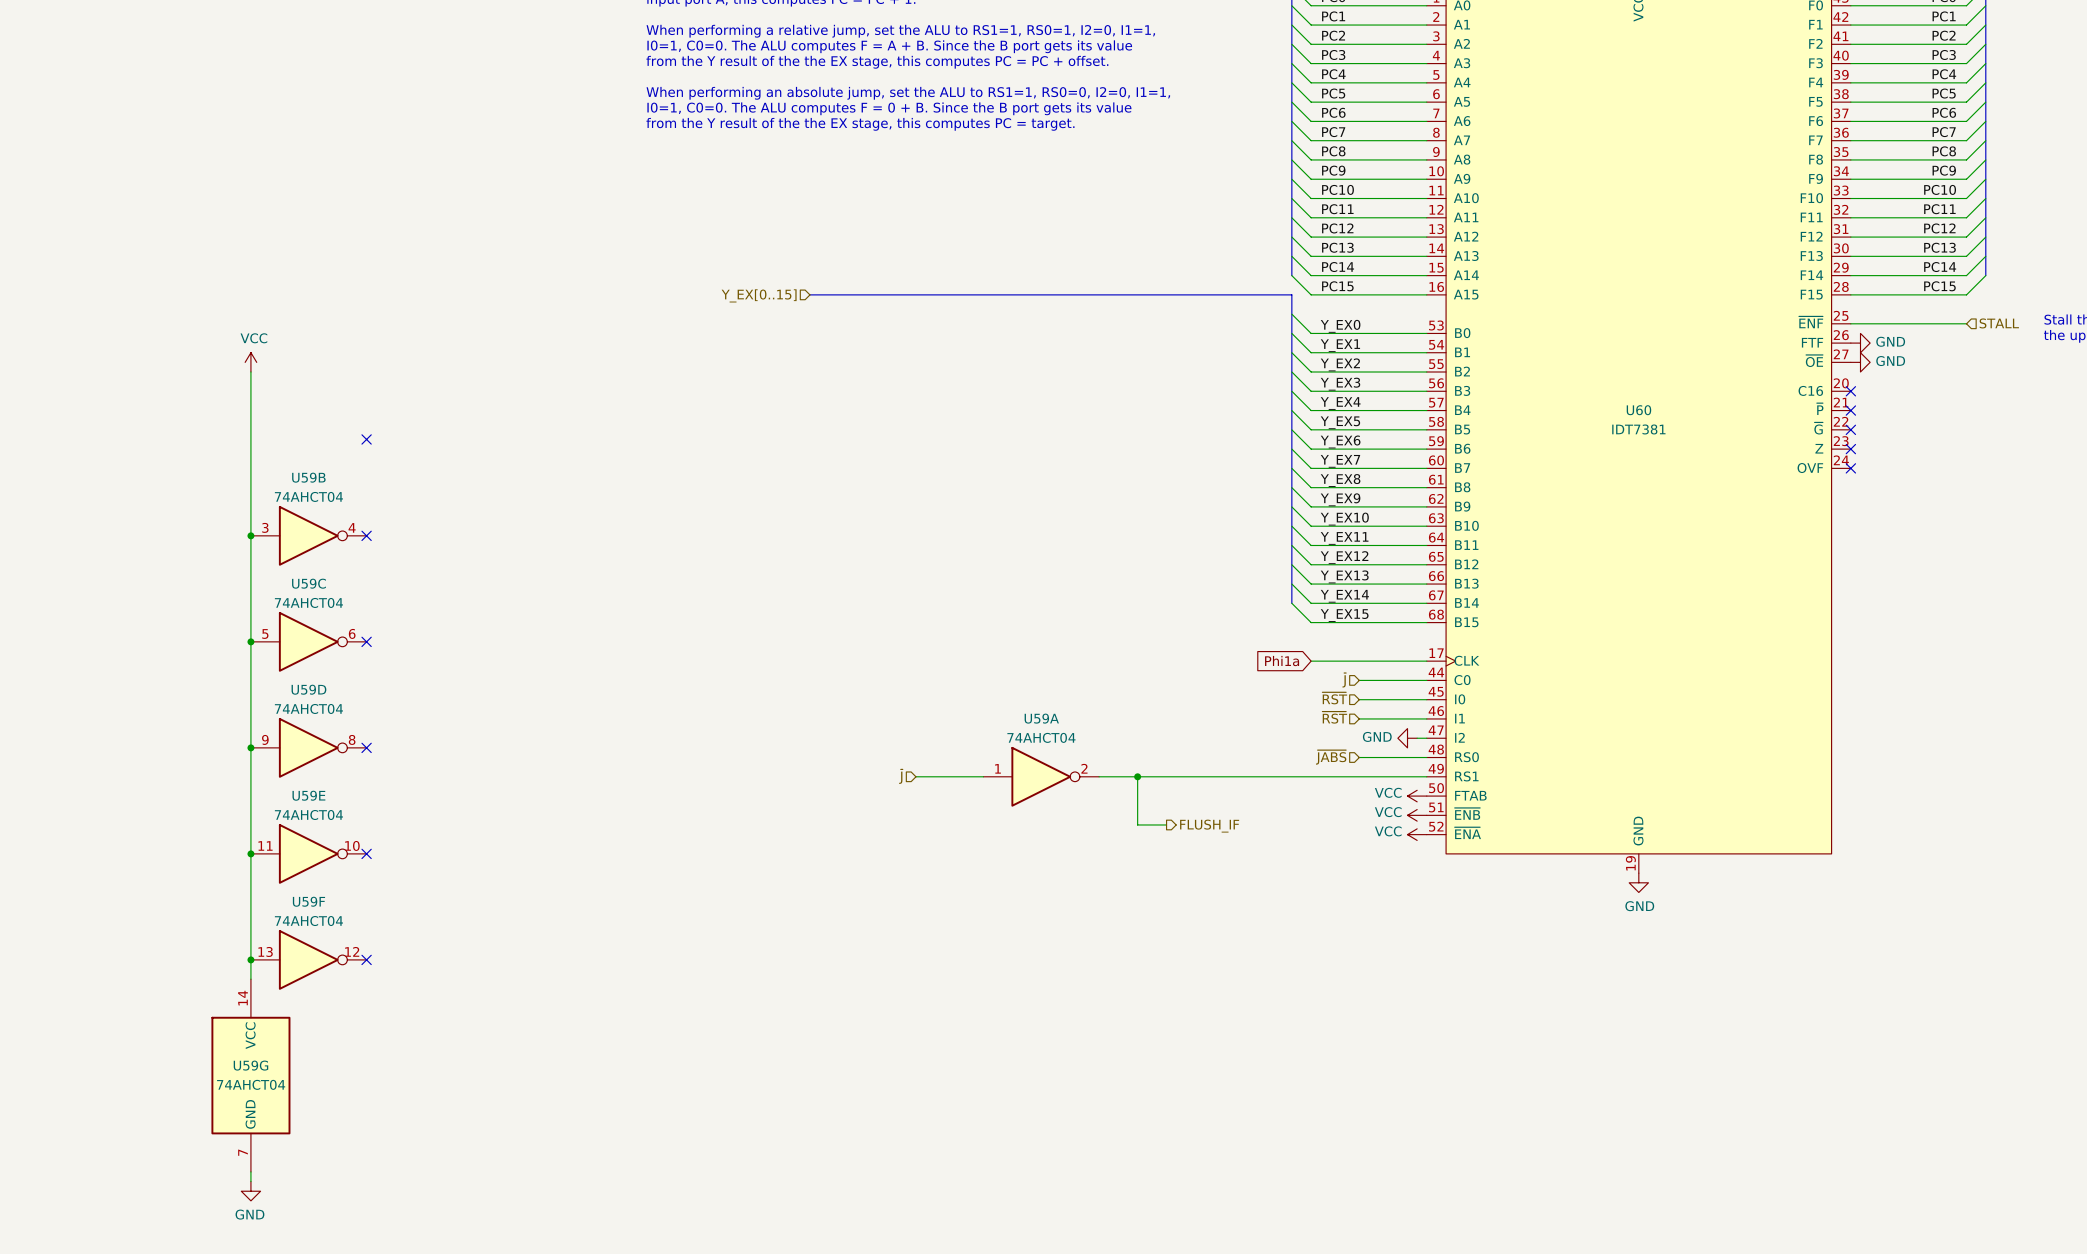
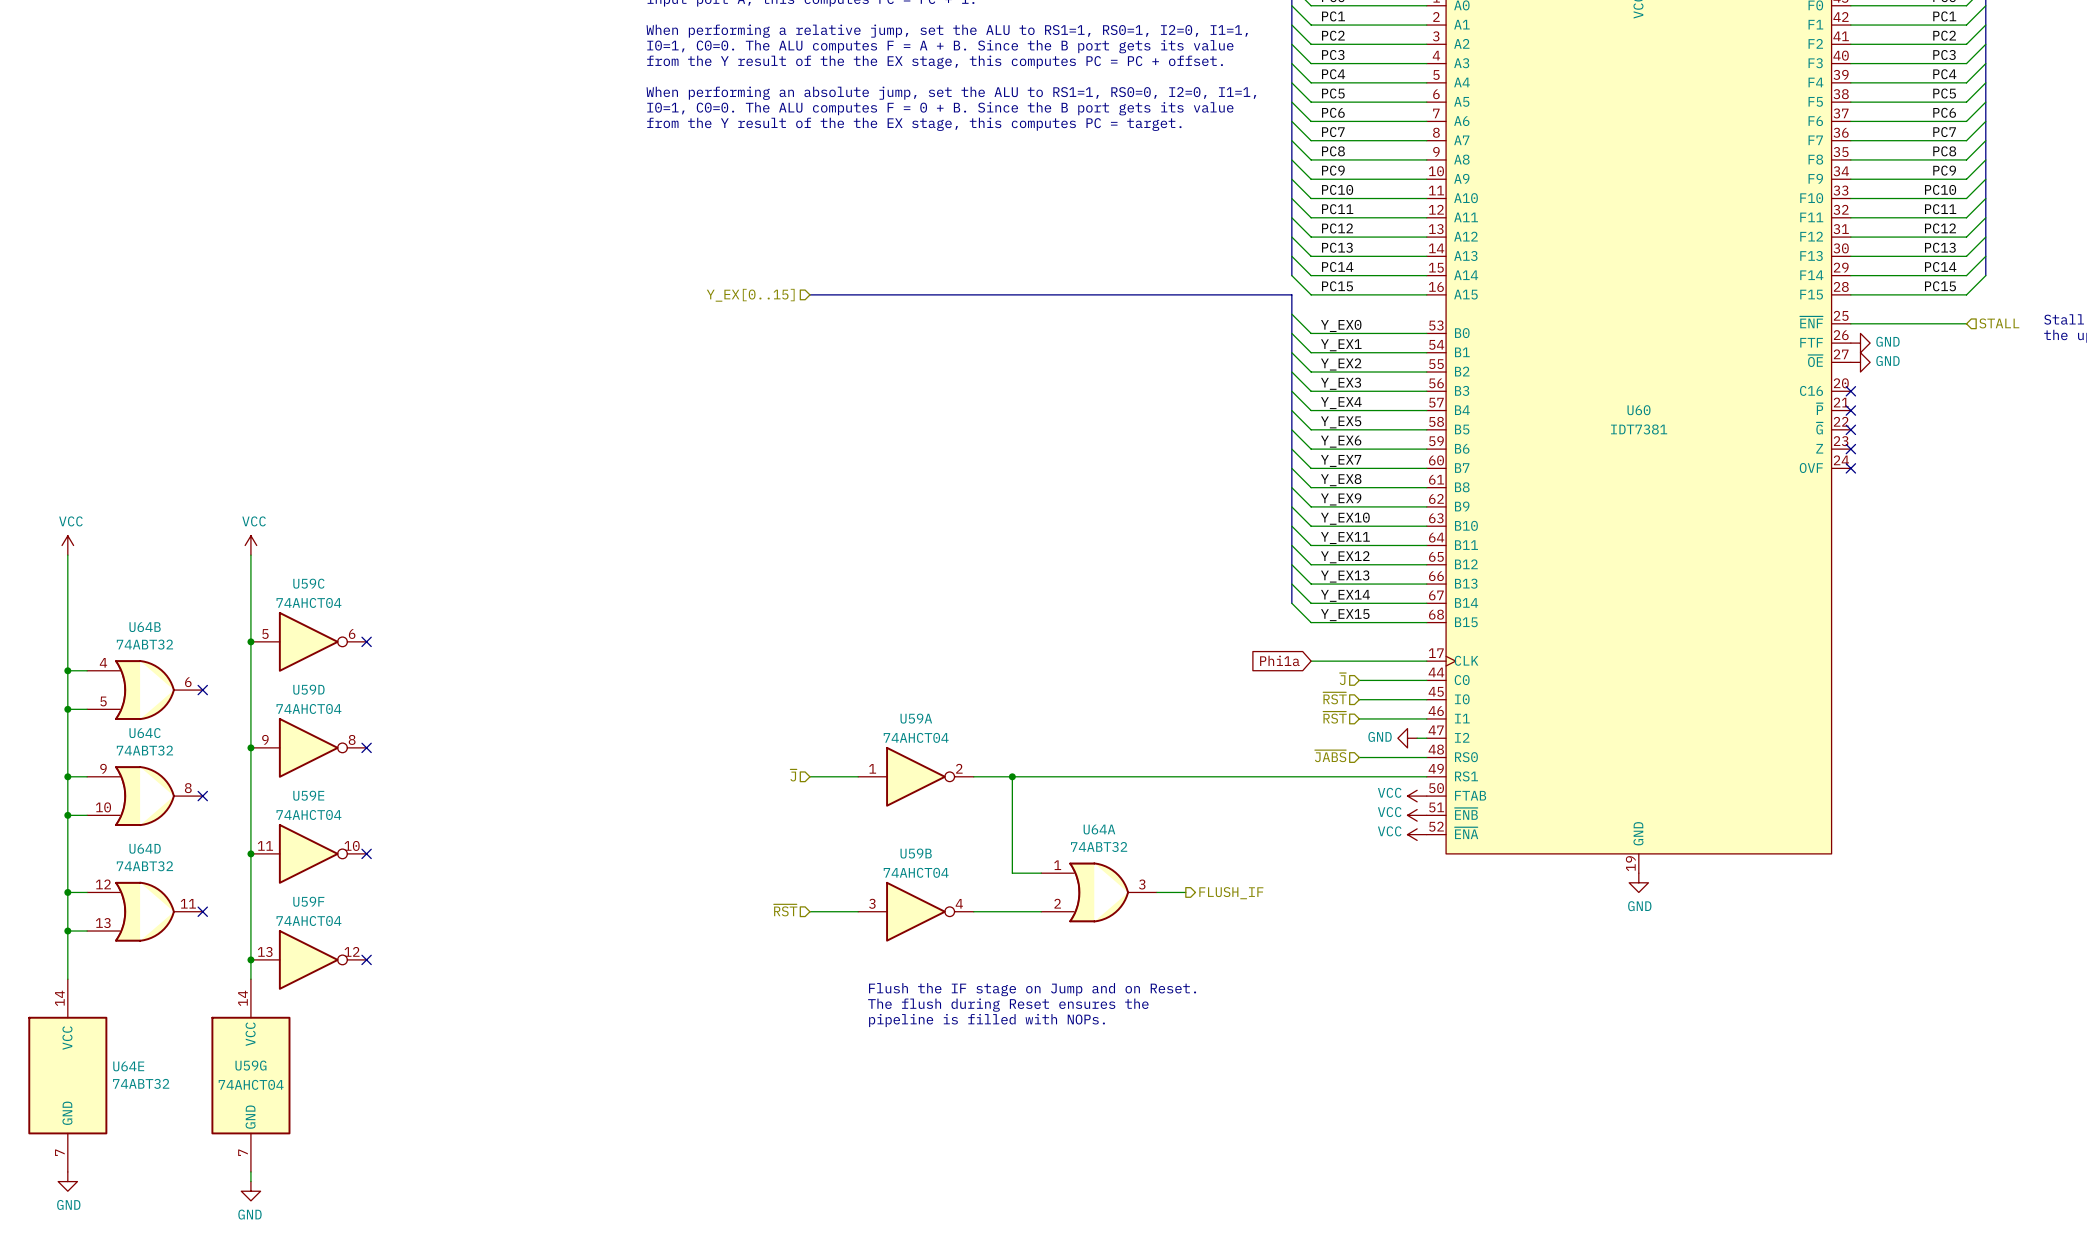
power symbol: VCC (250, 362) -> none
wire: (250, 372) (250, 555) -> none
no-connect mark: (366, 439) -> none
junction: (250, 535) -> none
U59B position: (308, 535) -> (915, 911)
no-connect mark: (366, 535) -> none
power symbol: none -> VCC (67, 545)
power symbol: none -> VCC (250, 545)
wire: none -> (67, 555) (67, 979)
wire: none -> (67, 670) (87, 670)
junction: none -> (67, 670)
U64B: none -> 74ABT32 (144, 690)
no-connect mark: none -> (202, 690)
wire: none -> (67, 709) (87, 709)
junction: none -> (67, 709)
wire: none -> (67, 776) (87, 776)
junction: none -> (67, 776)
wire: none -> (809, 776) (858, 776)
hierarchical label position: ~{J} (900, 776) -> ~{J} (793, 775)
wire: none -> (1012, 776) (1012, 873) (1041, 873)
junction: none -> (1012, 776)
U59A position: (1041, 776) -> (915, 776)
wire: (1137, 776) (1137, 824) (1166, 824) -> none
junction: (1137, 776) -> none
U64C: none -> 74ABT32 (144, 796)
no-connect mark: none -> (202, 796)
wire: none -> (67, 815) (87, 815)
junction: none -> (67, 815)
hierarchical label position: FLUSH_IF (1209, 826) -> FLUSH_IF (1231, 893)
wire: none -> (67, 892) (87, 892)
junction: none -> (67, 892)
U64A: none -> 74ABT32 (1099, 892)
wire: none -> (1156, 892) (1185, 892)
hierarchical label: none -> ~{RST} (785, 910)
U64D: none -> 74ABT32 (144, 911)
no-connect mark: none -> (202, 911)
wire: none -> (809, 911) (858, 911)
wire: none -> (973, 911) (1041, 911)
wire: none -> (67, 931) (87, 931)
junction: none -> (67, 931)
text: none -> Flush the IF stage on Jump and on Reset. (1032, 989)
text: none -> The flush during Reset ensures the (1008, 1005)
text: none -> pipeline is filled with NOPs. (987, 1020)
U64E: none -> 74ABT32 (67, 1075)
power symbol: none -> GND (67, 1181)

